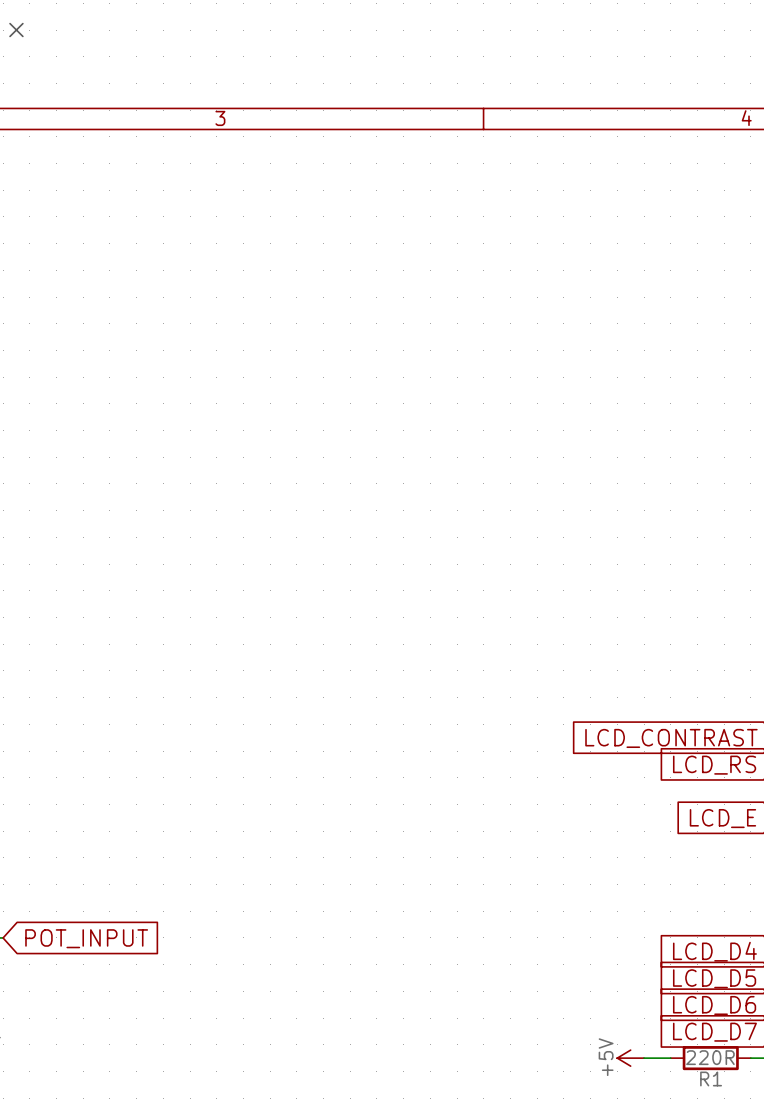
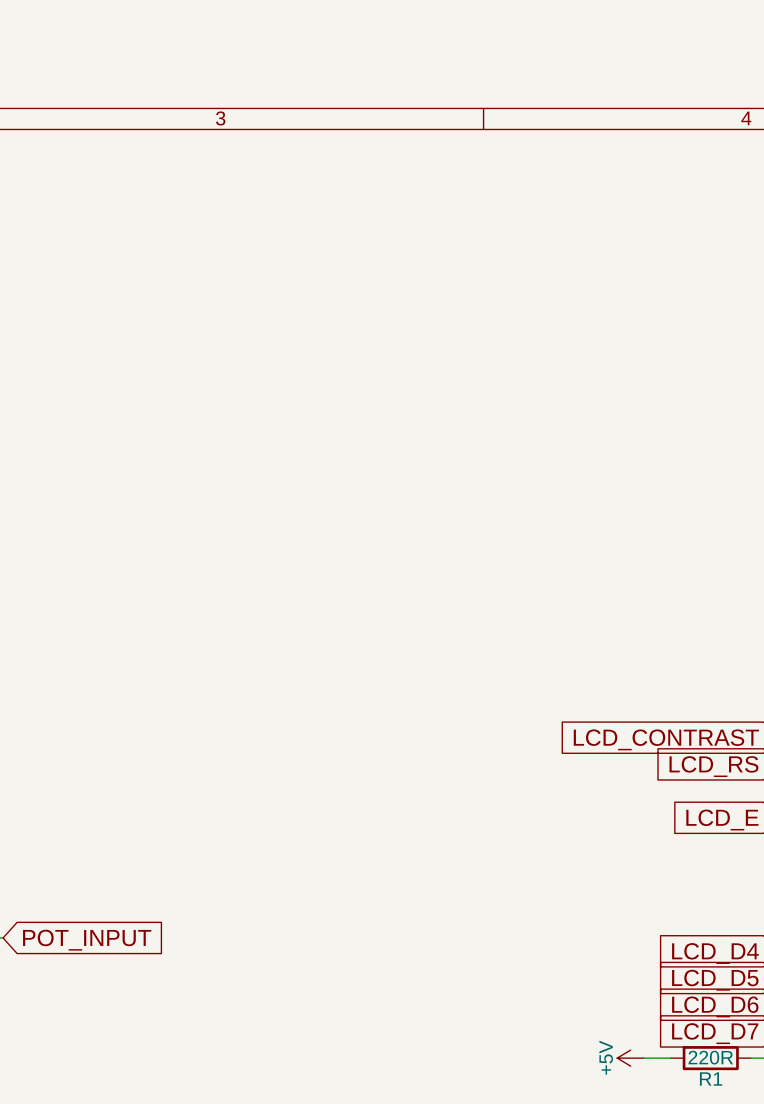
no-connect mark: (16, 30) -> none

